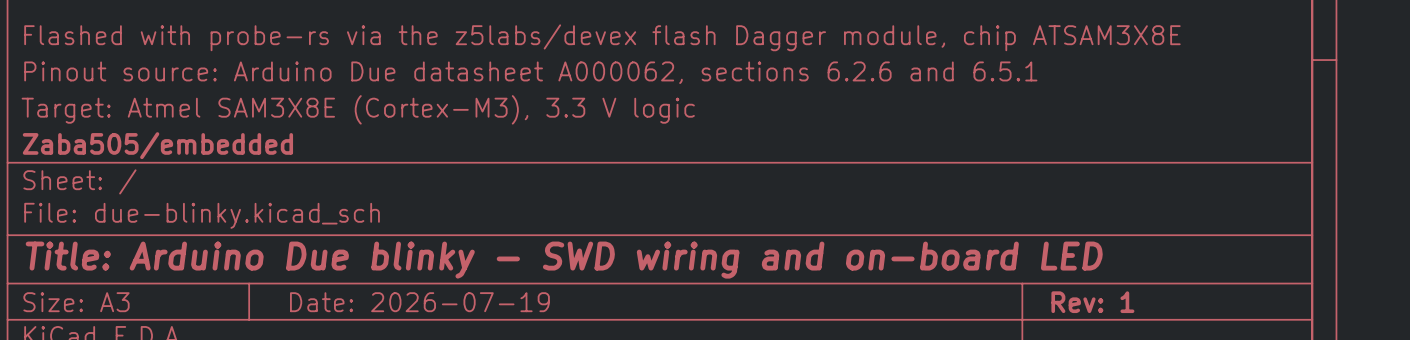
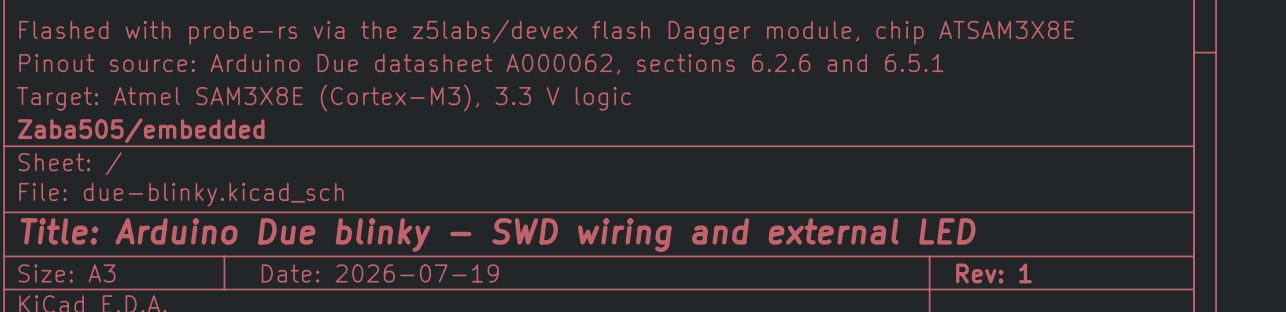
title block: Title: Arduino Due blinky - SWD wiring and on-board LED (564, 260) -> Title: Arduino Due blinky - SWD wiring and external LED (498, 235)

